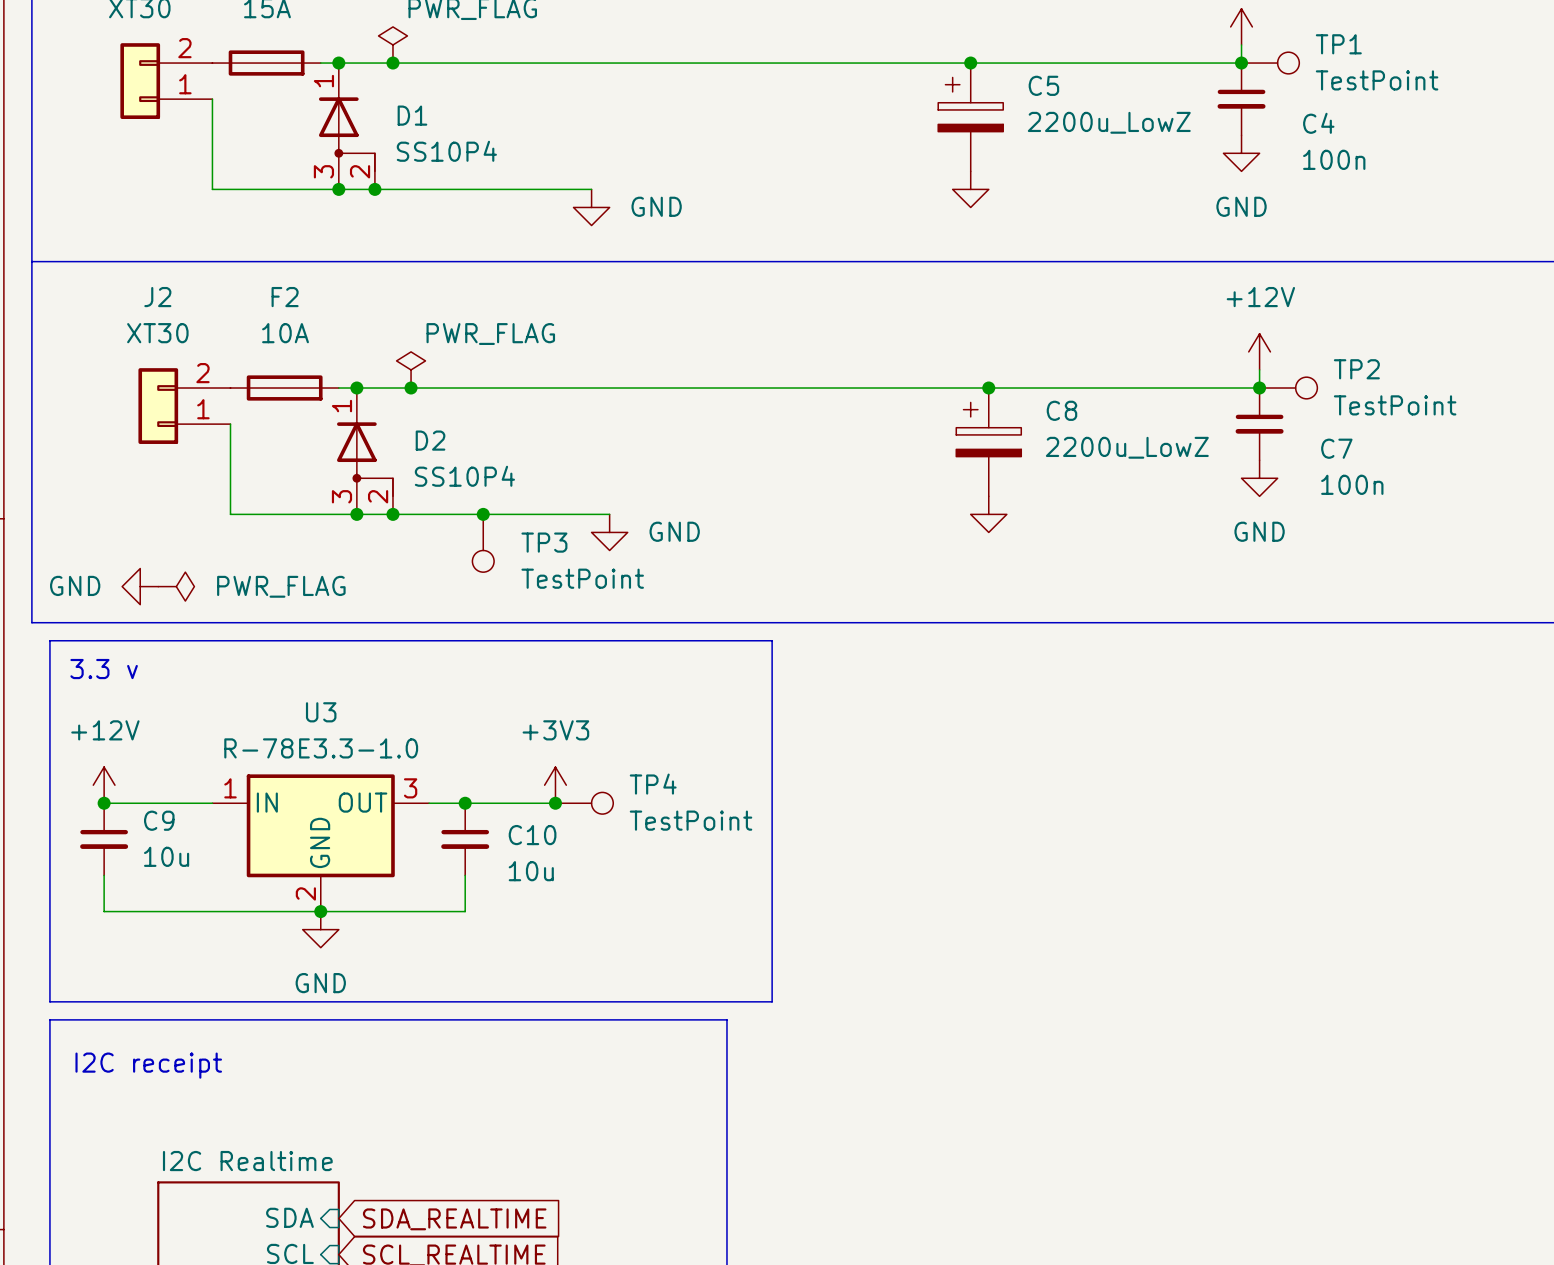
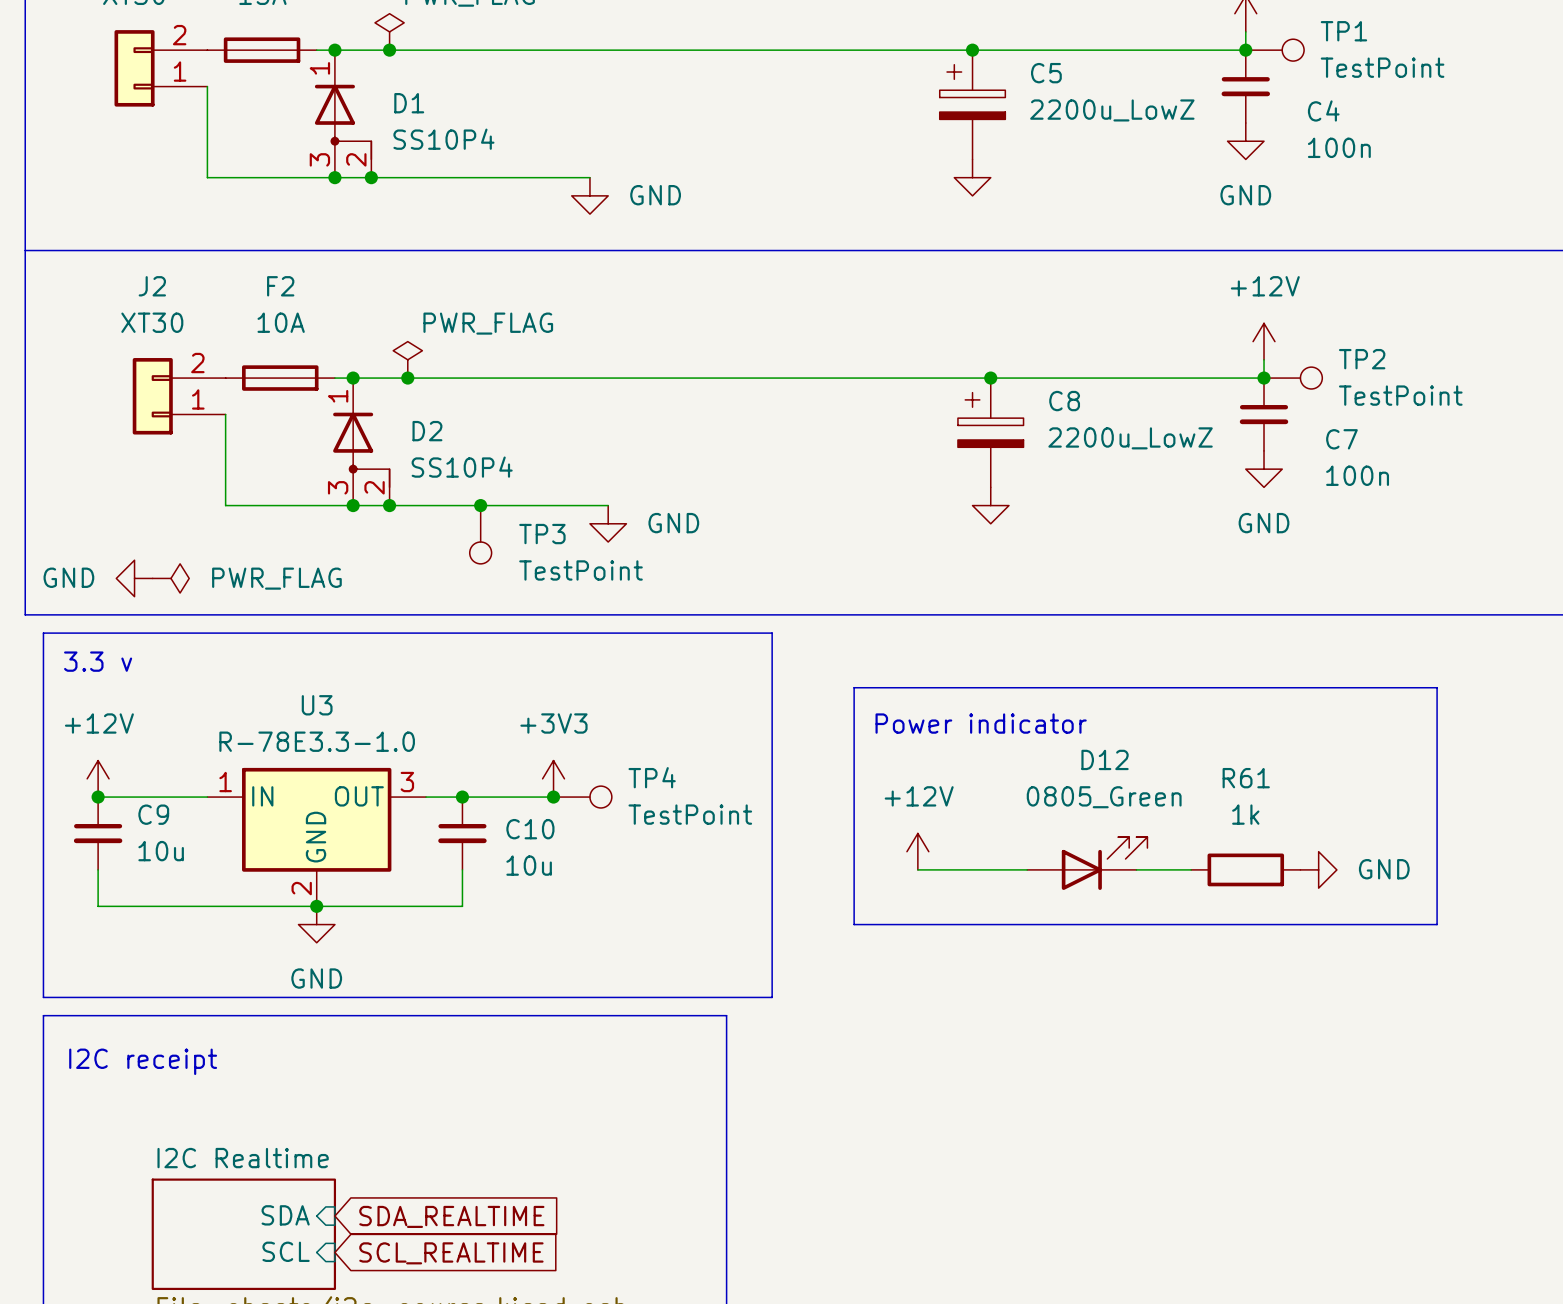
line: none -> (854, 687) (1437, 687) (1437, 924) (854, 924) (854, 687)
text: none -> Power indicator (981, 723)
power symbol: none -> +12V (917, 851)
D12: none -> 0805_Green (1087, 863)
wire: none -> (917, 869) (1027, 869)
wire: none -> (1136, 869) (1191, 869)
R61: none -> 1k (1245, 869)
power symbol: none -> GND (1318, 869)

